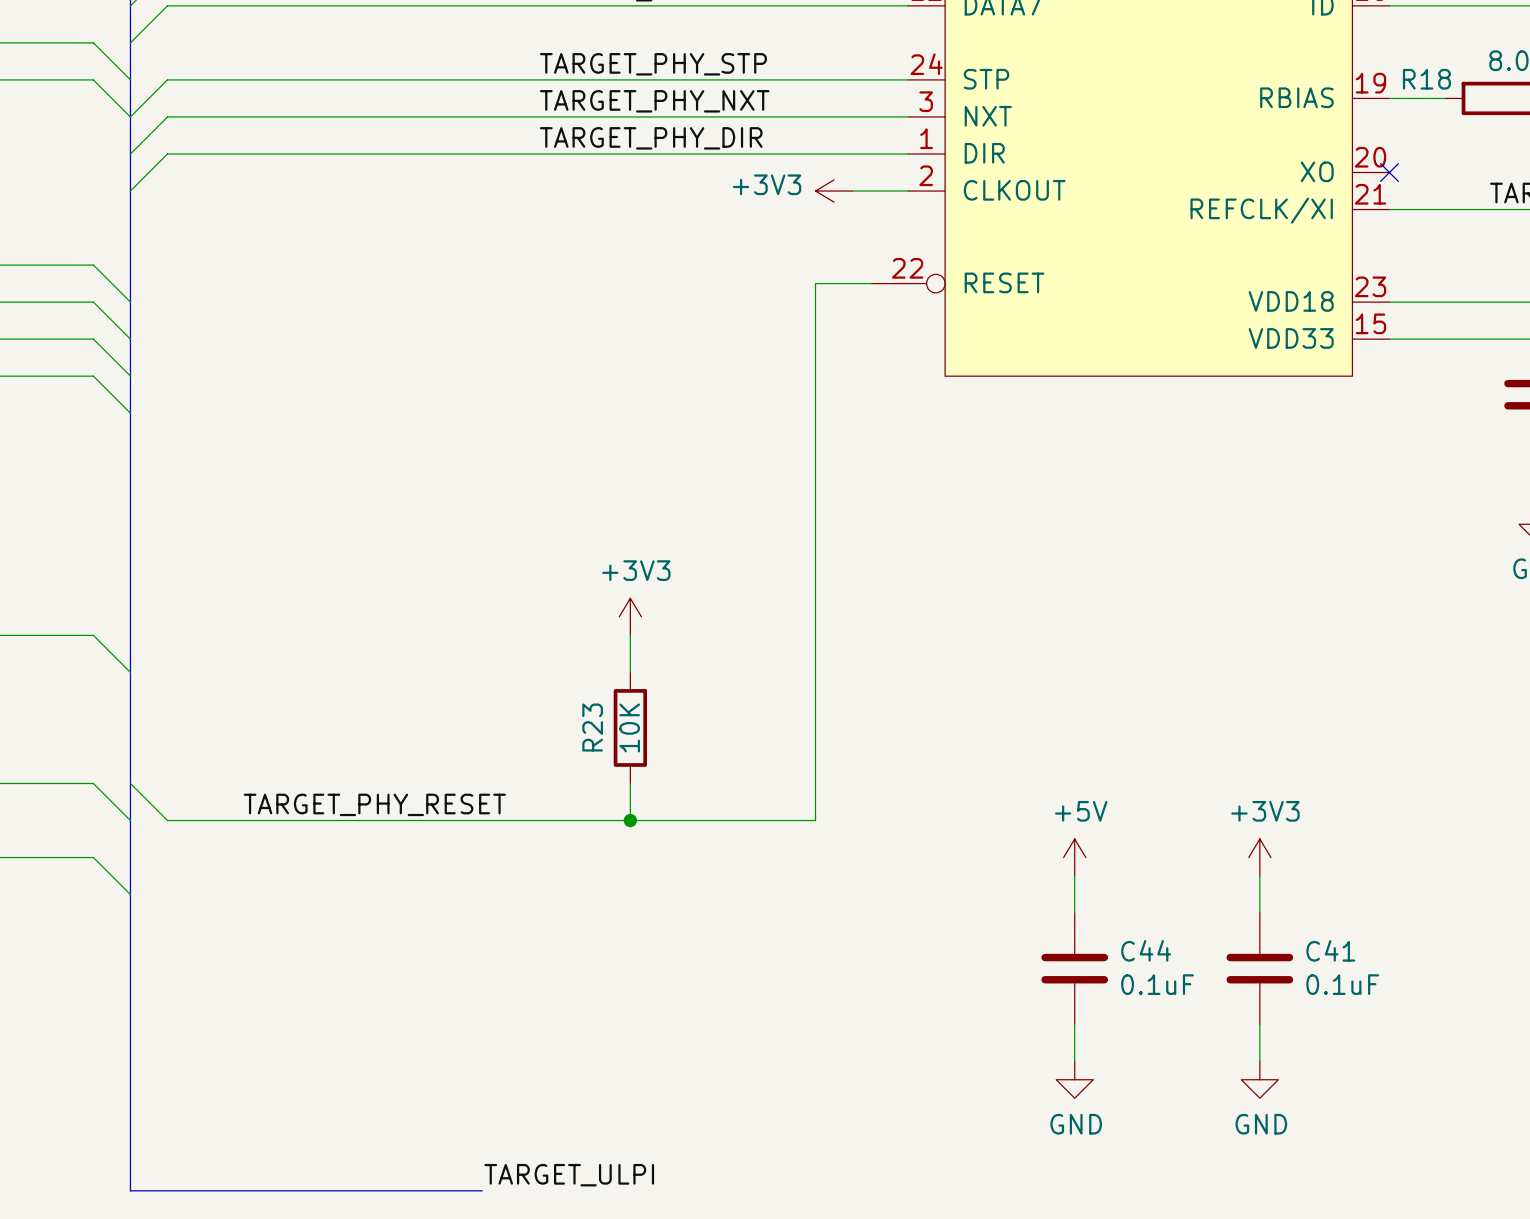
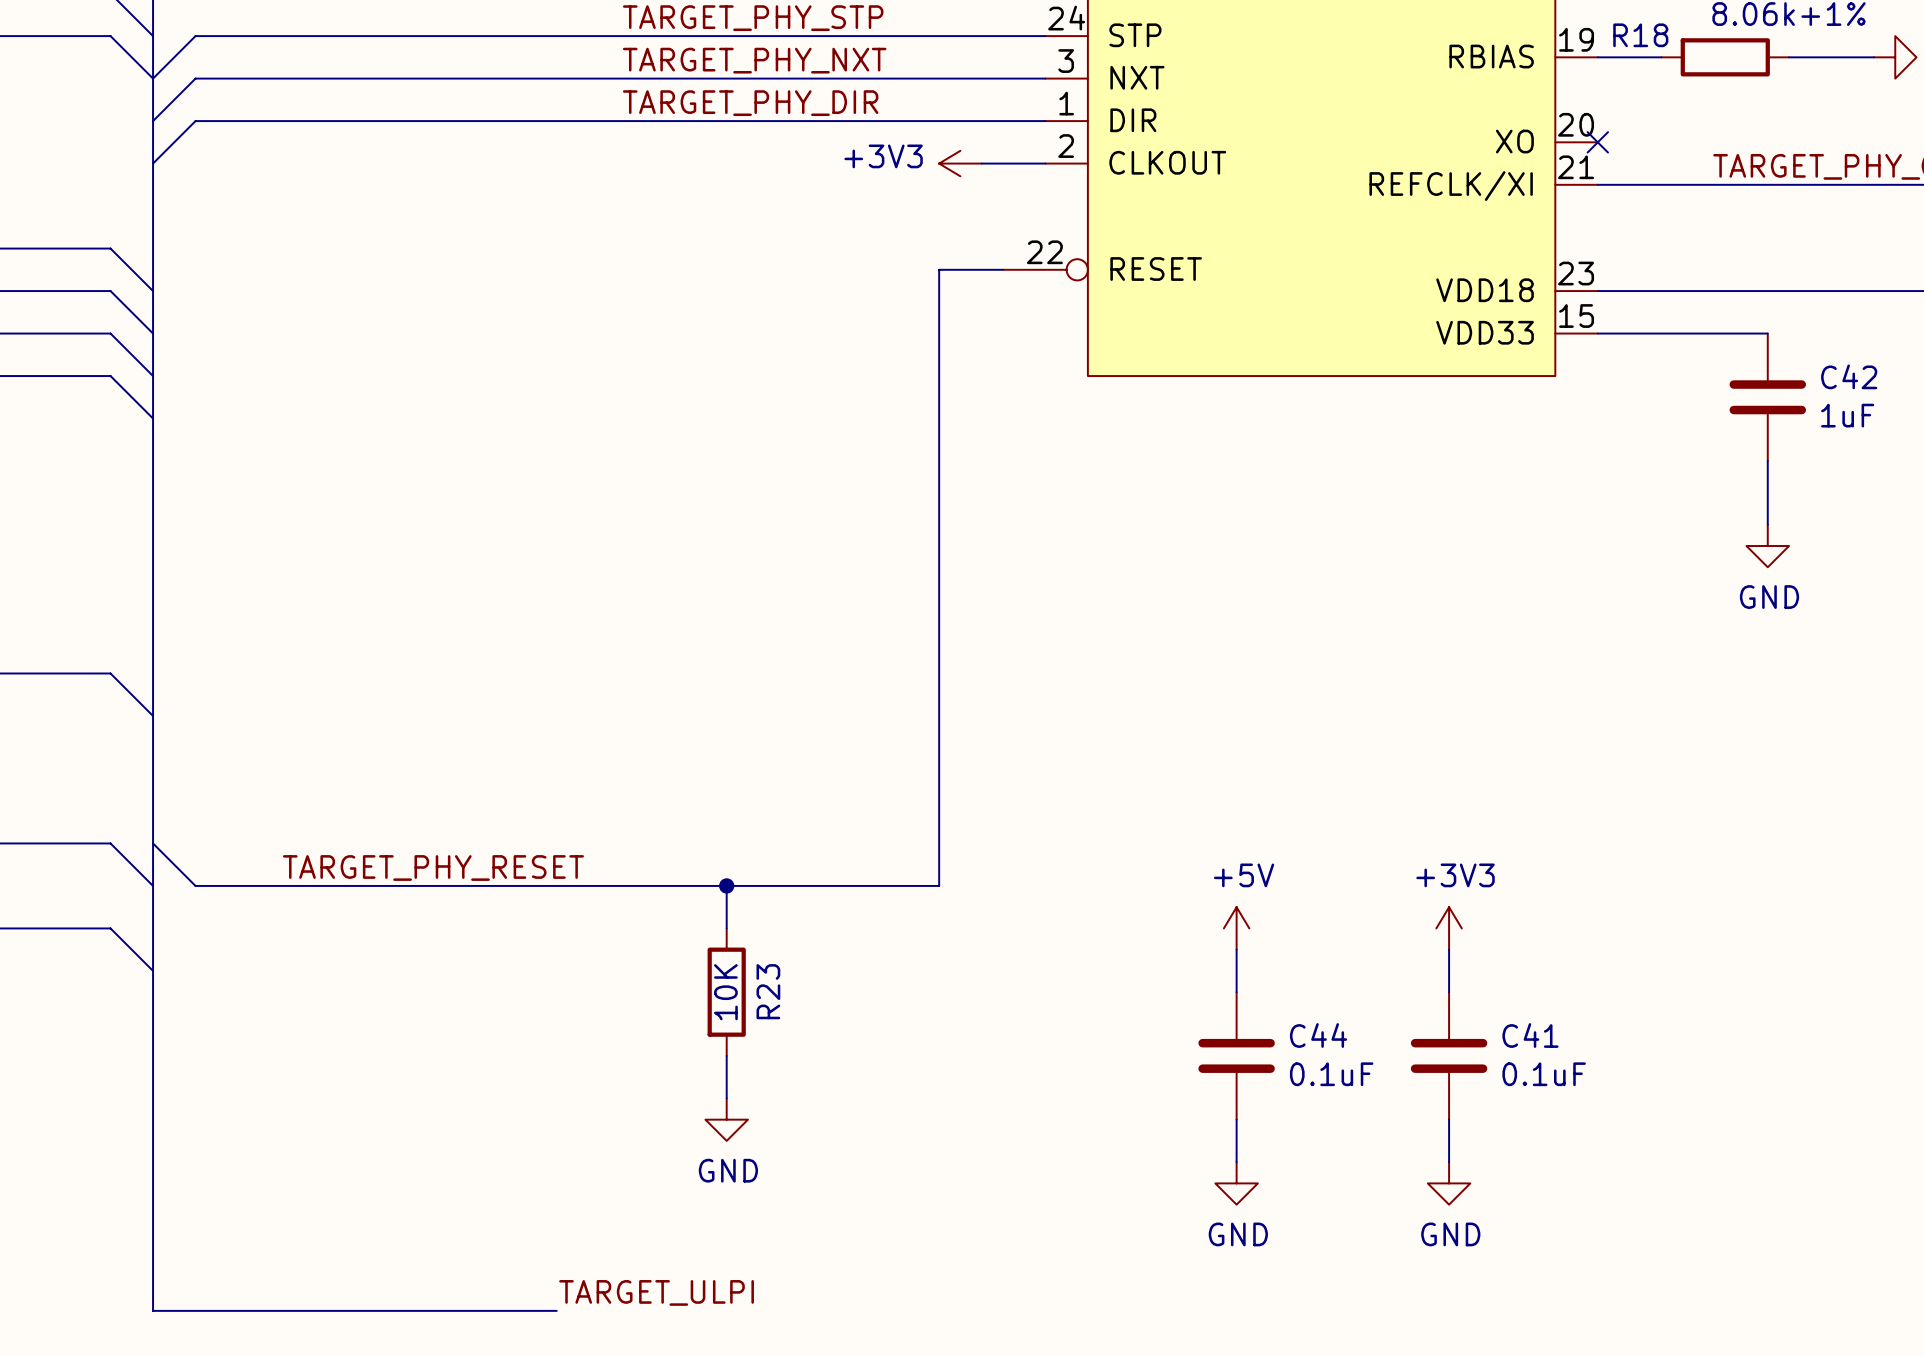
power symbol: +3V3 (630, 616) -> none
wire: (630, 635) (630, 672) -> (726, 1055) (726, 1098)
R23 name position: R23 (592, 727) -> R23 (768, 991)
R23 position: (630, 727) -> (726, 992)
wire: (630, 783) (630, 820) -> (726, 928) (726, 885)
power symbol: none -> GND (726, 1119)

